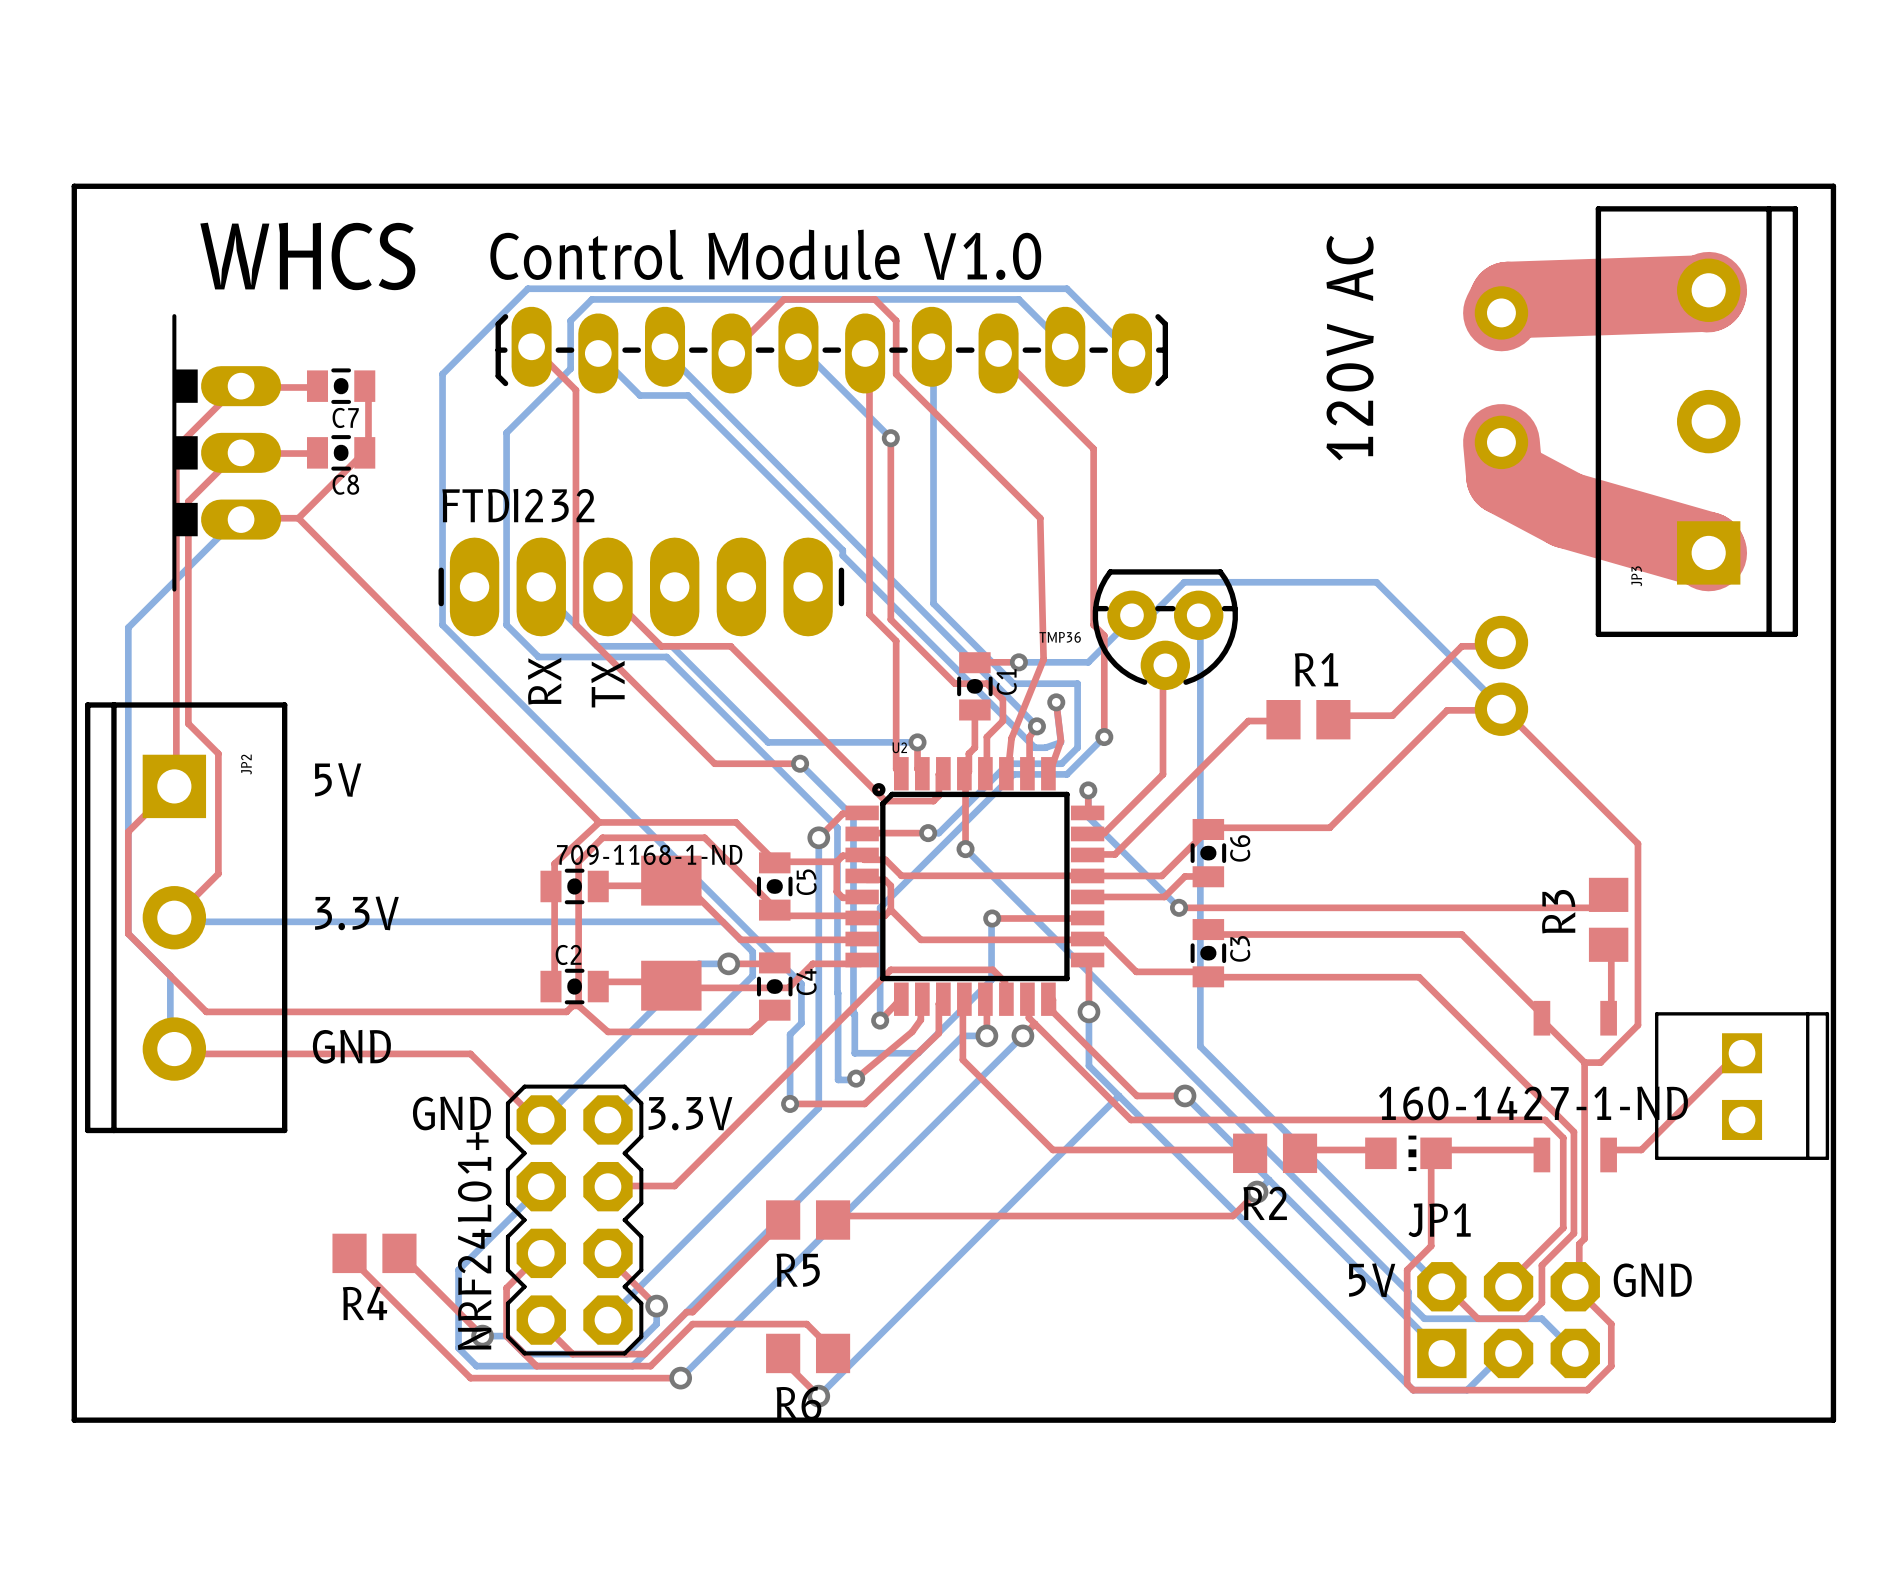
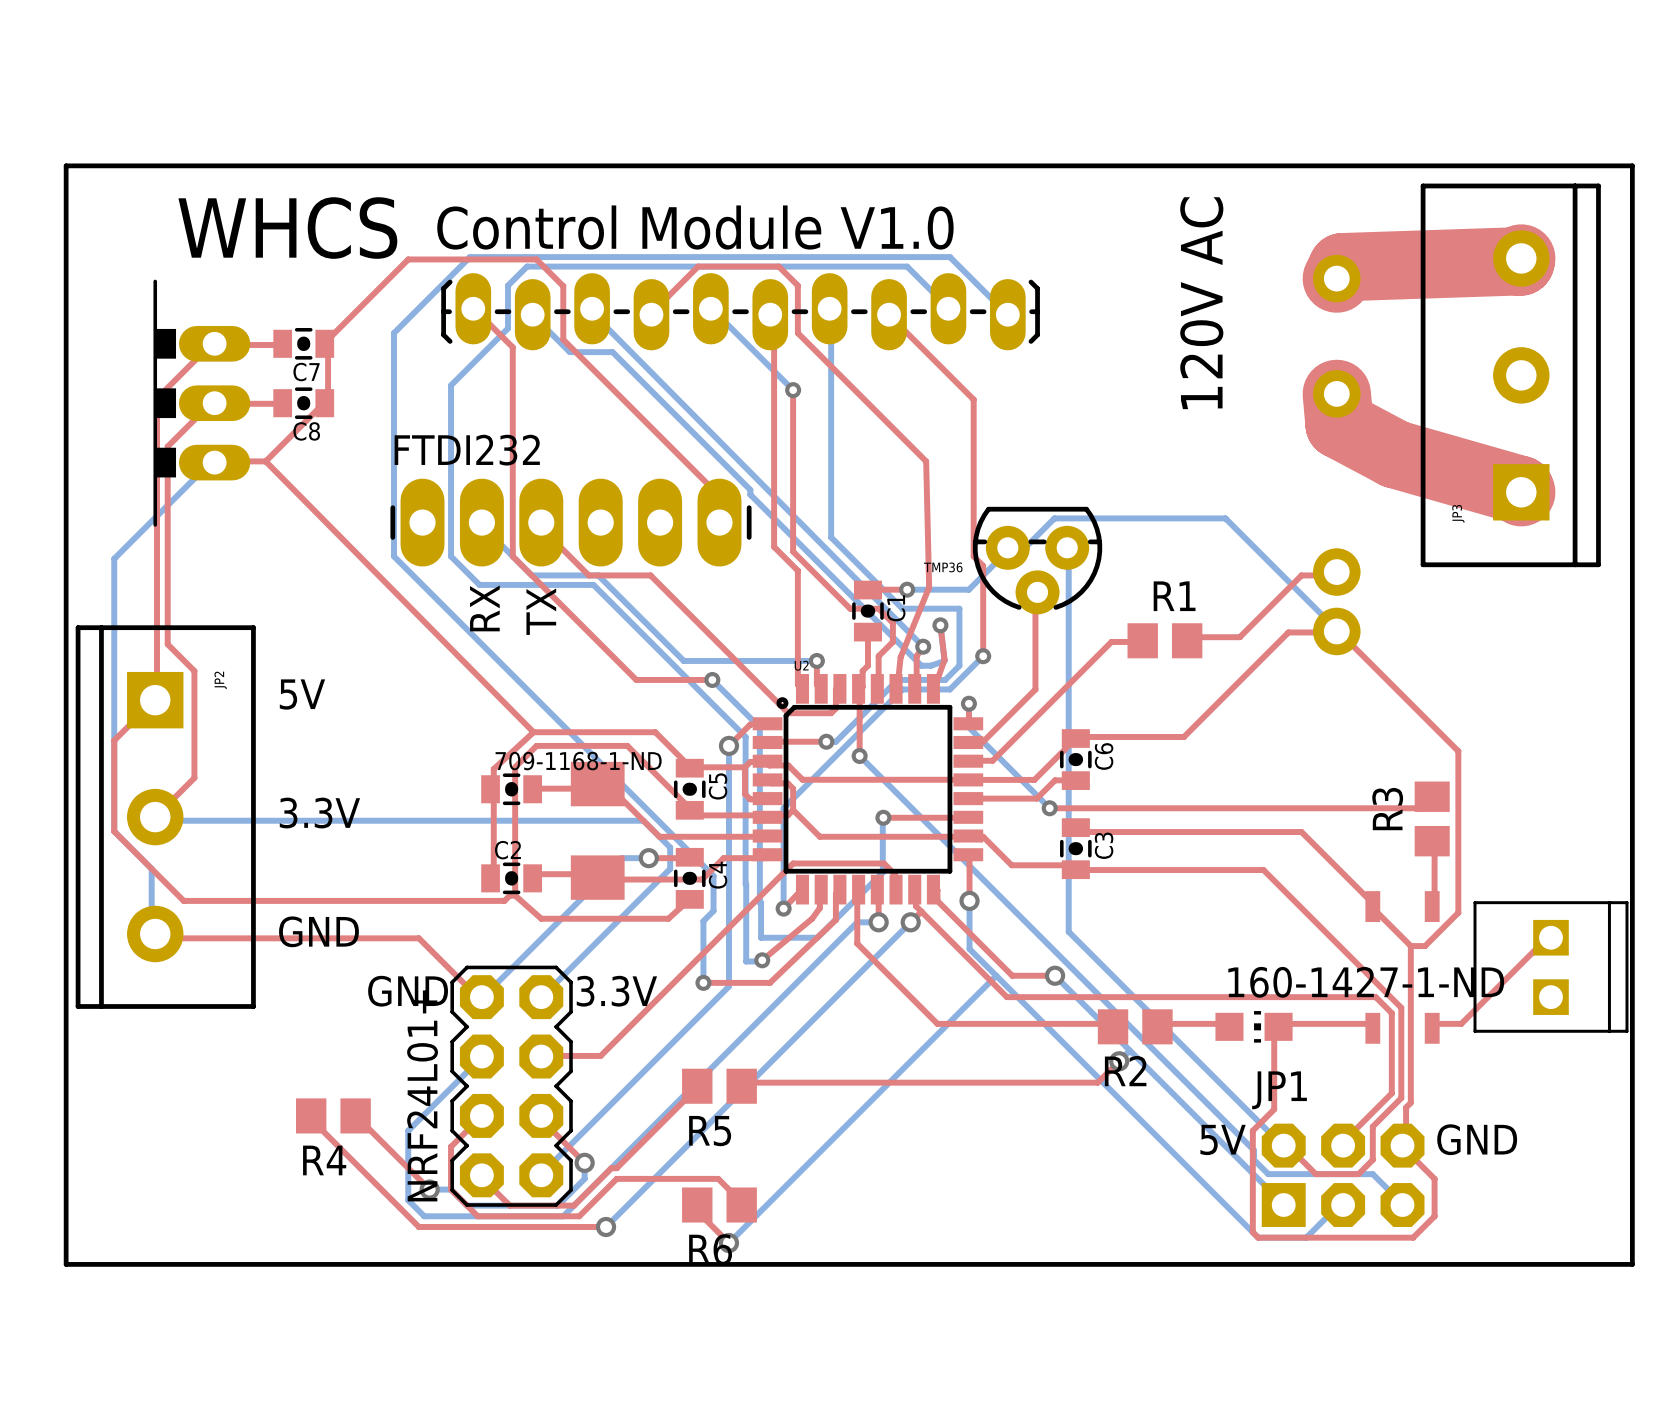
top track: none -> (324, 343) (408, 259) (536, 259) (563, 286) (563, 339) (718, 494) (719, 522)

